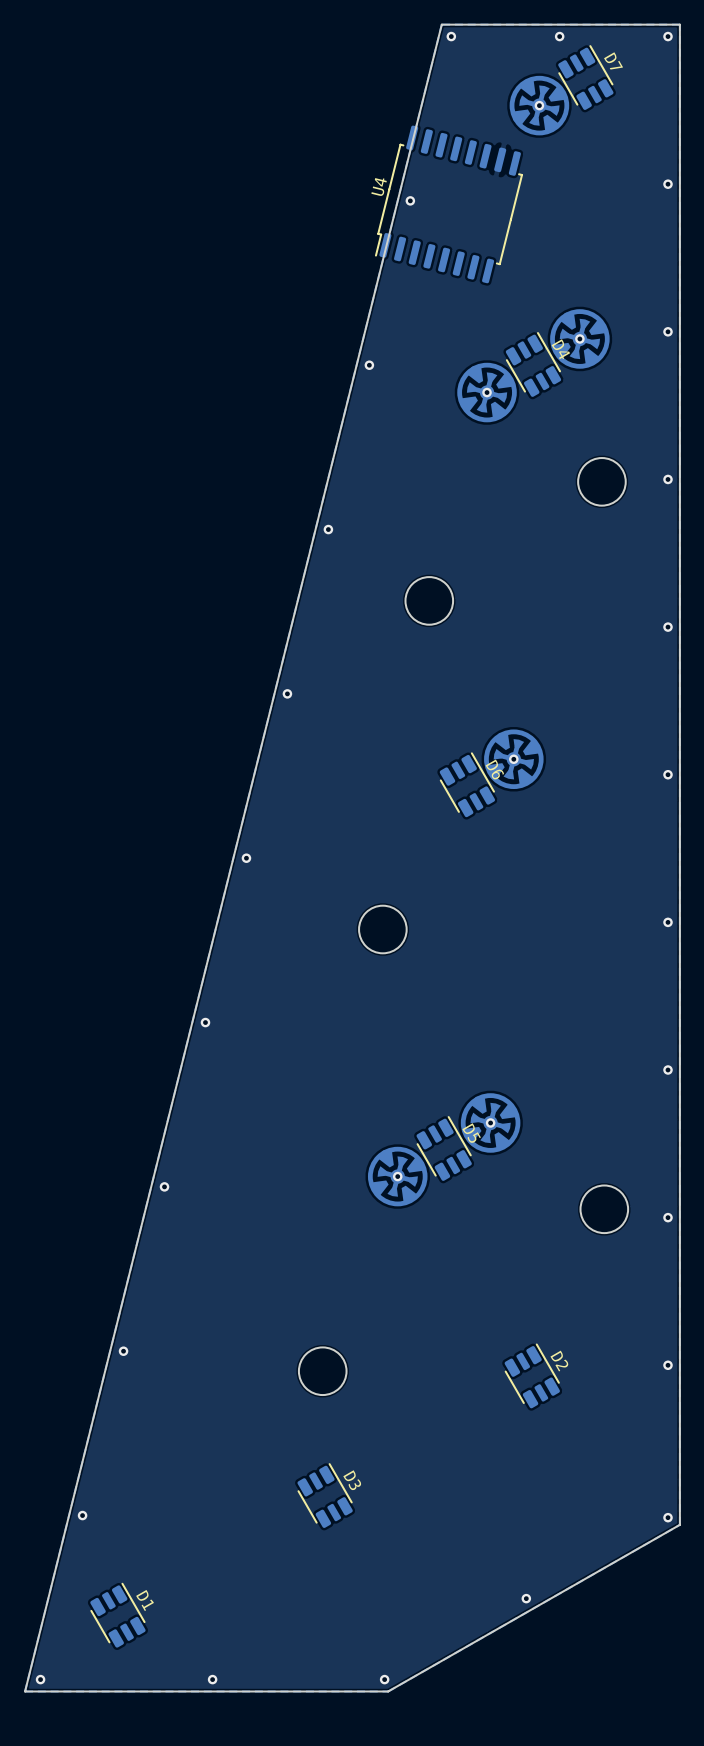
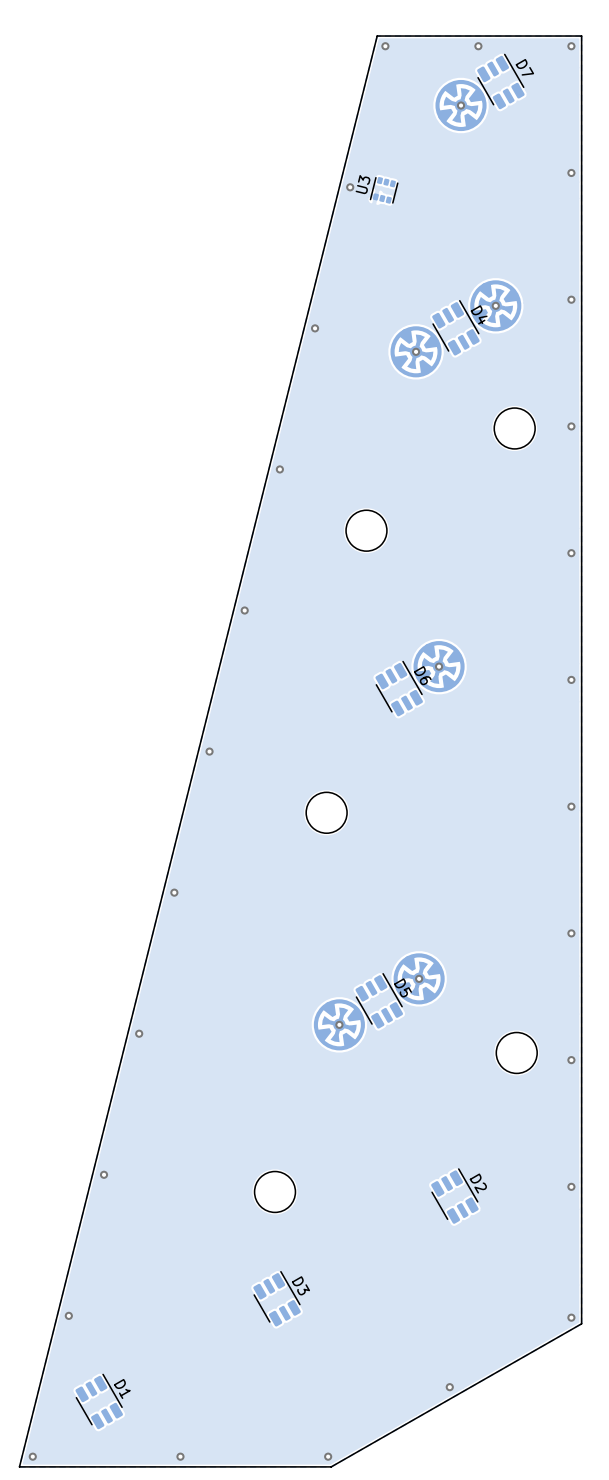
U4: (448, 204) -> none
U3: none -> (384, 190)

